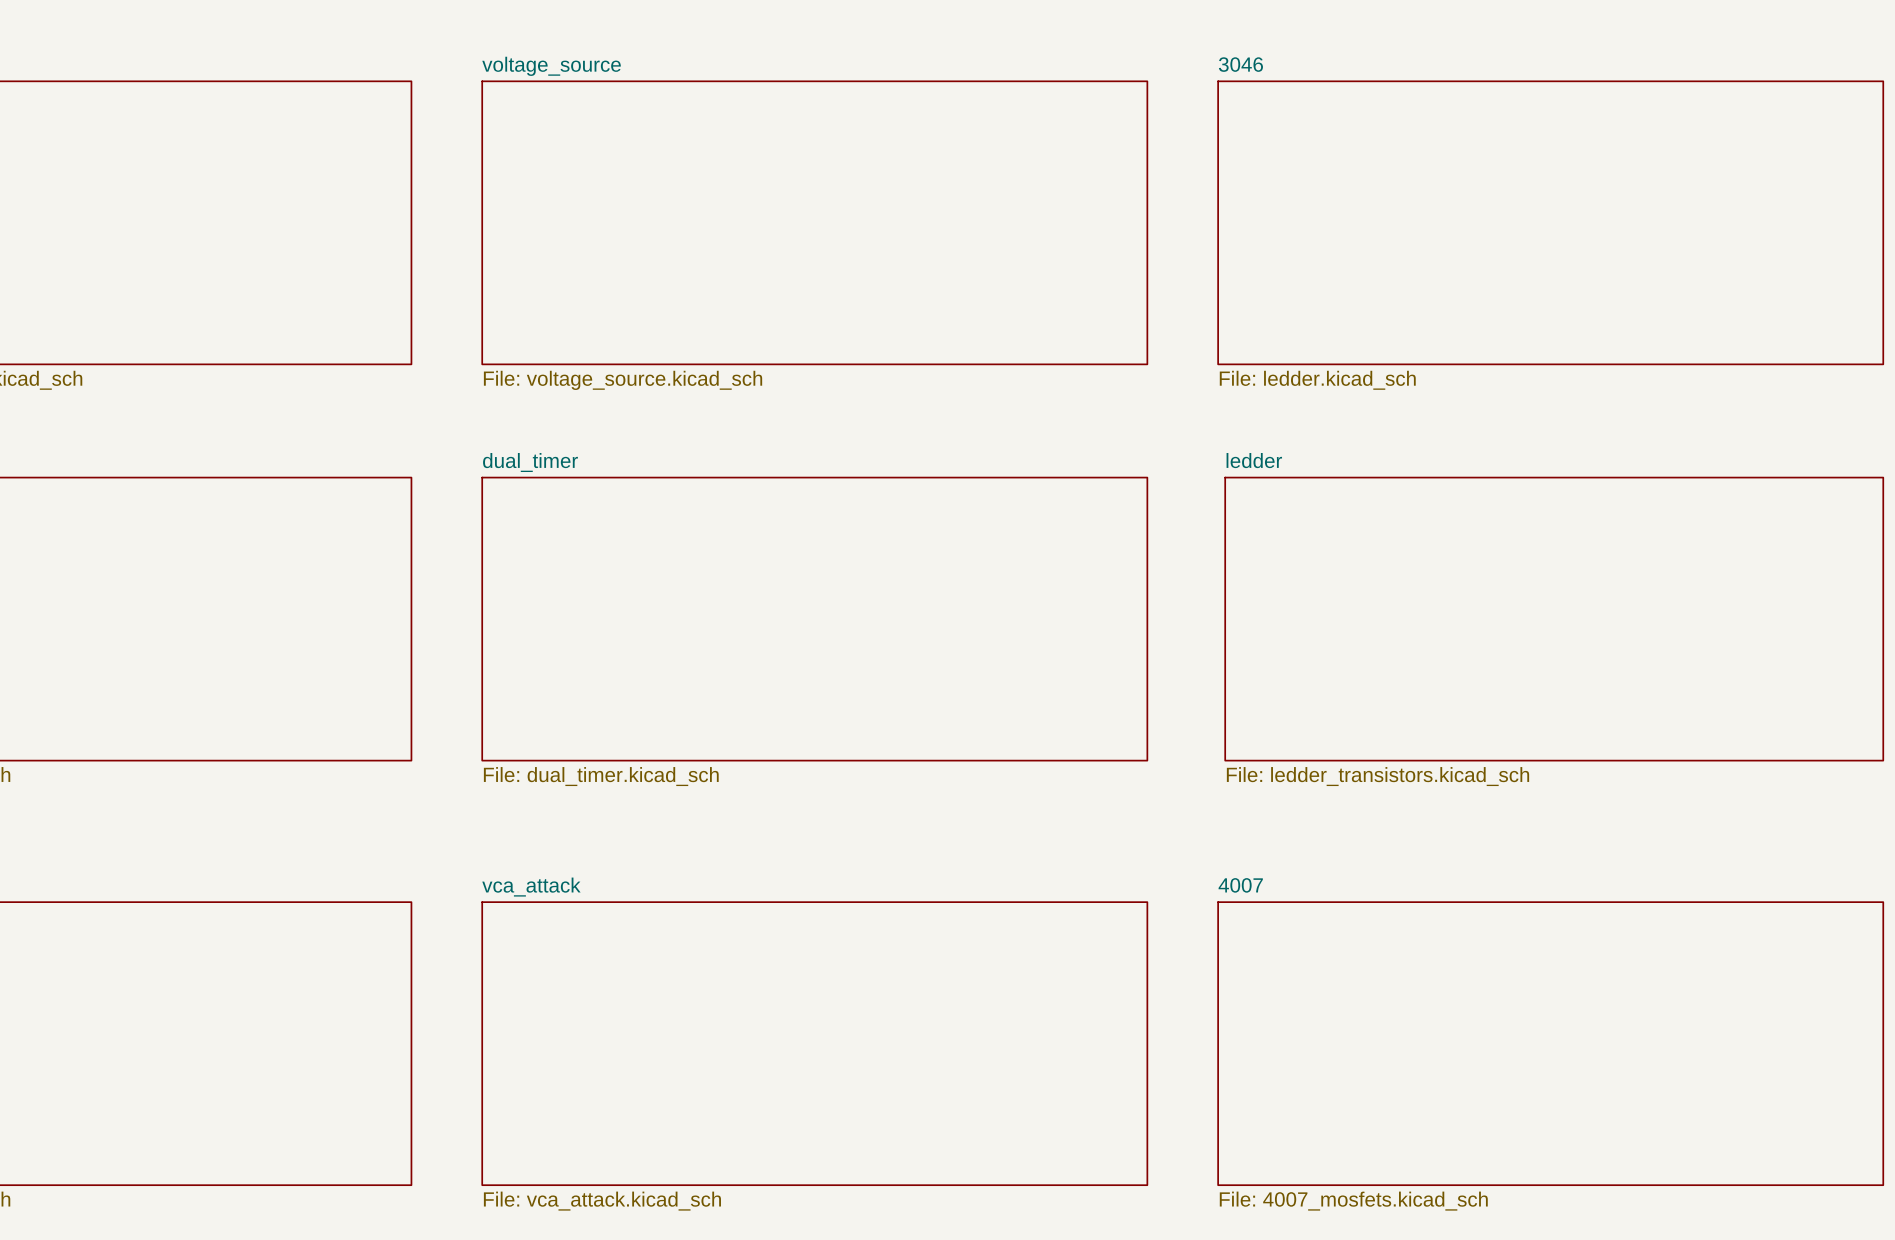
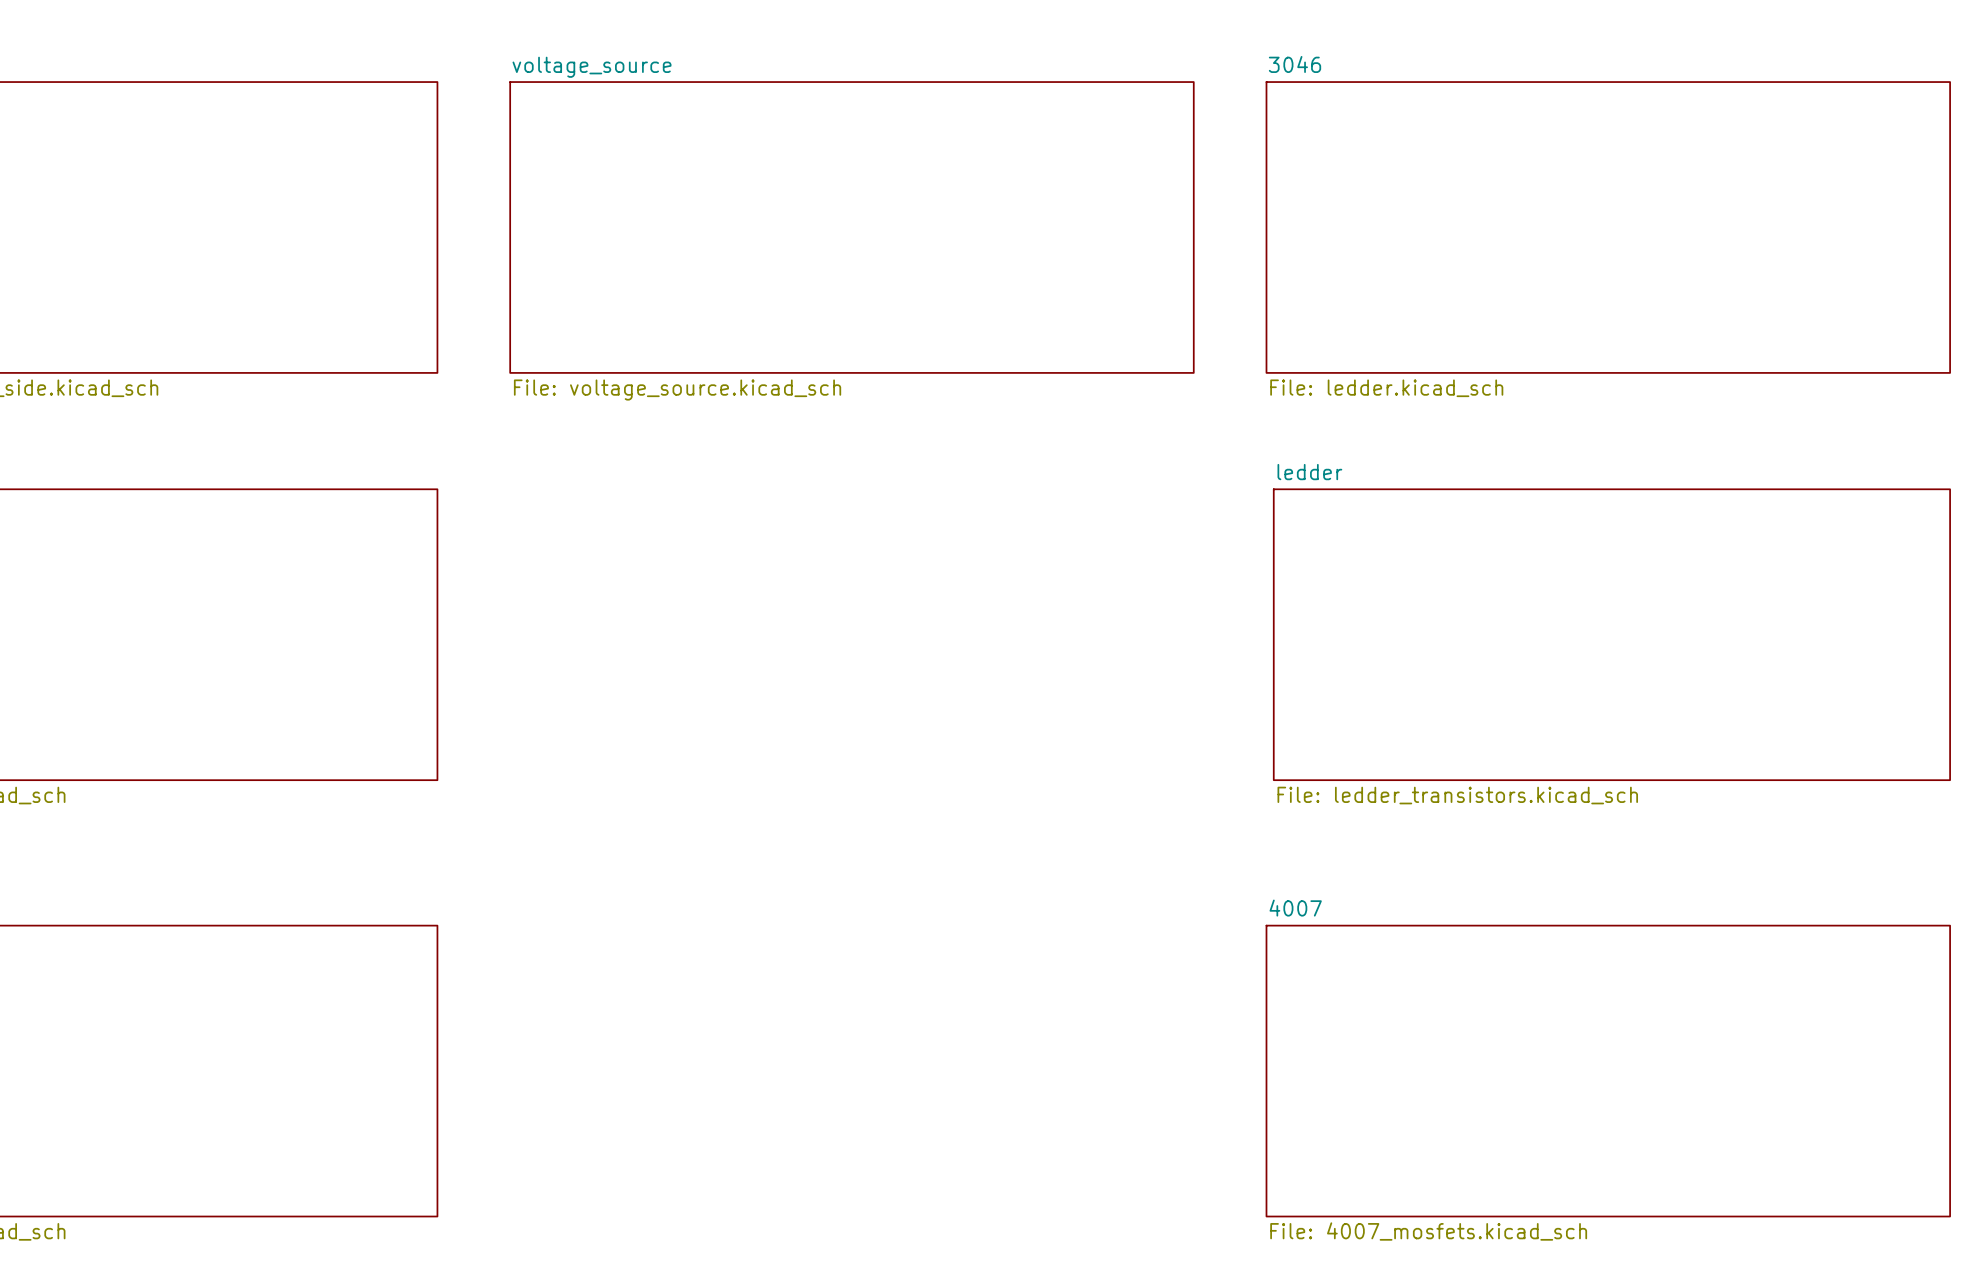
sheet dual_timer: File: dual_timer.kicad_sch (814, 619) -> none
sheet vca_attack: File: vca_attack.kicad_sch (814, 1043) -> none

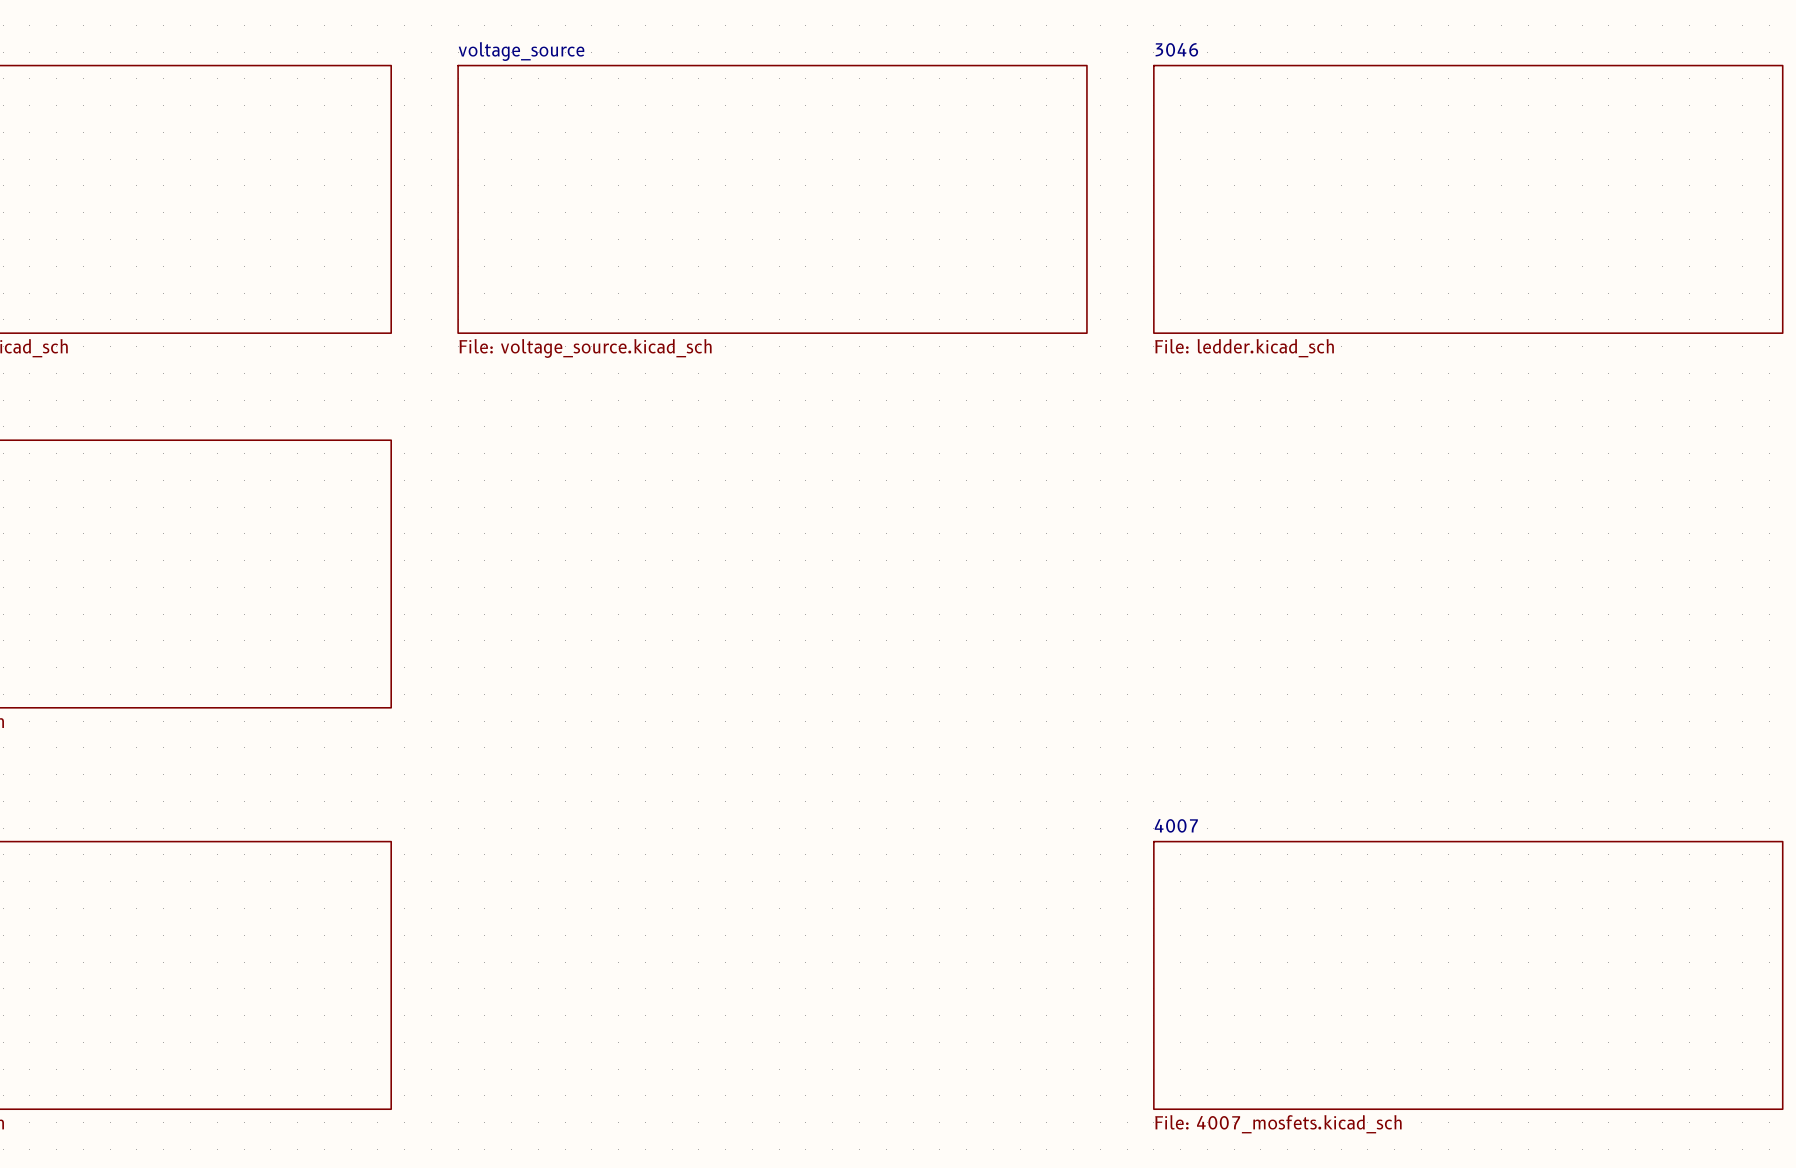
sheet ledder: File: ledder_transistors.kicad_sch (1611, 634) -> none

